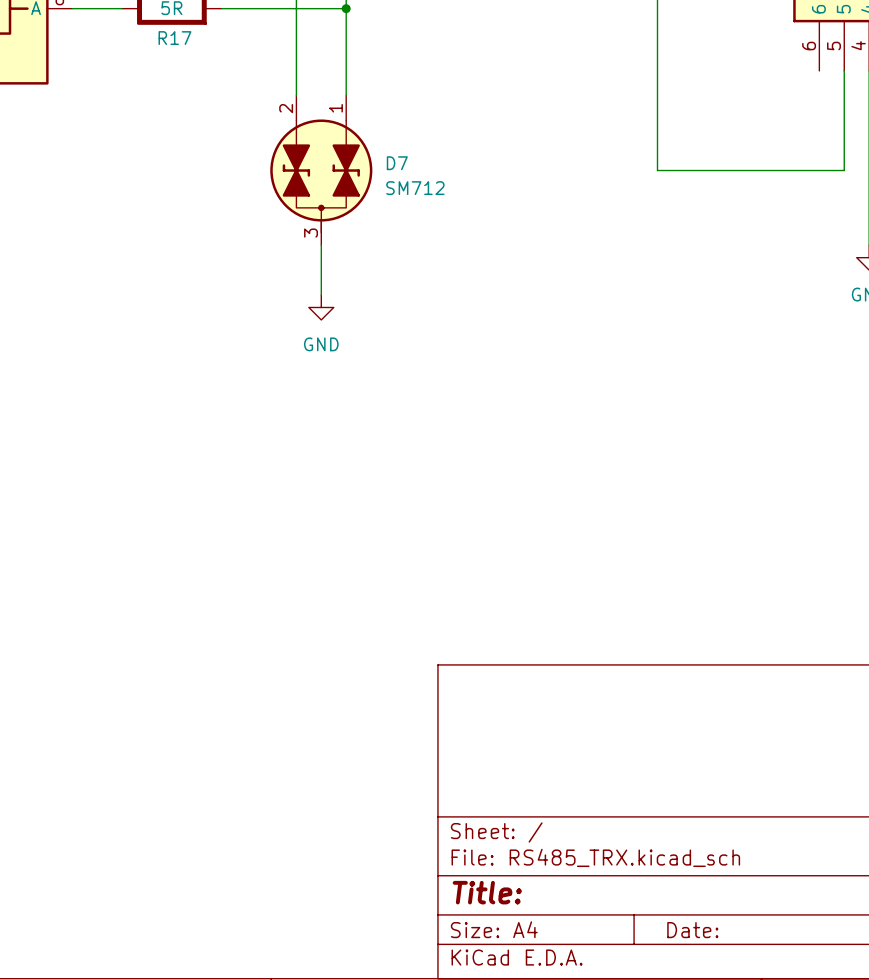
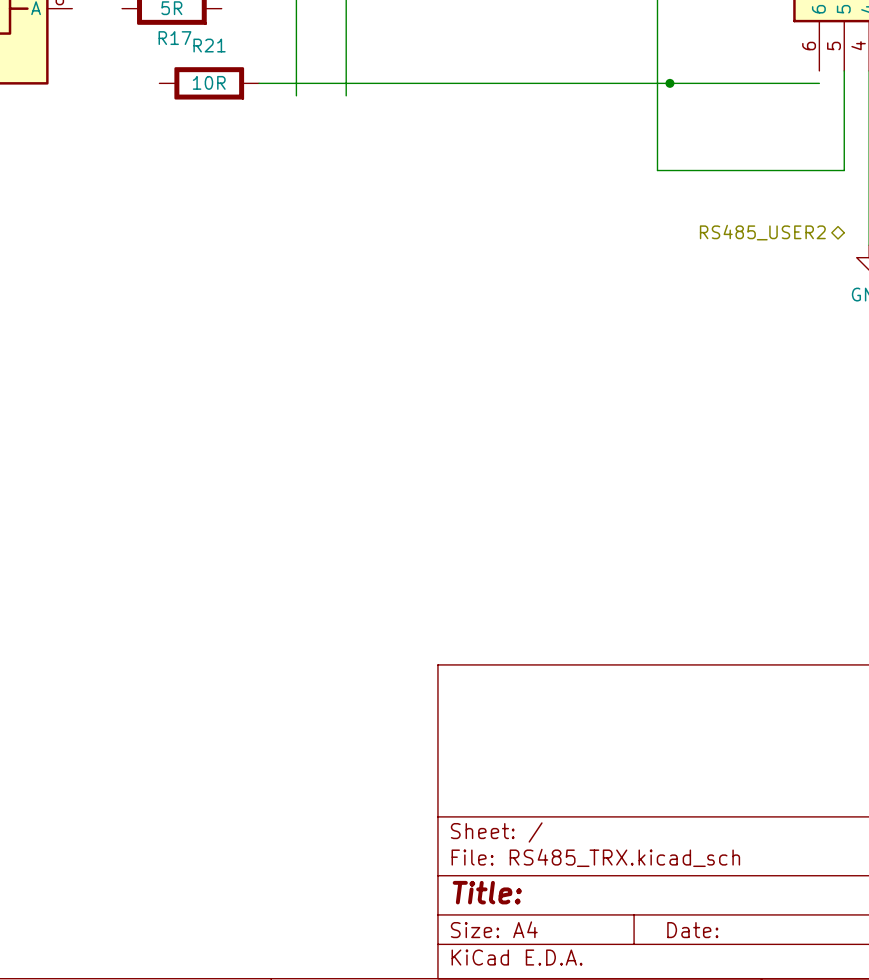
wire: (72, 8) (122, 8) -> none
wire: (221, 8) (346, 8) -> none
junction: (346, 8) -> none
R21: none -> 10R (209, 83)
wire: none -> (259, 83) (819, 83)
junction: none -> (669, 83)
D7: SM712 (321, 170) -> none
hierarchical label: none -> RS485_USER2 (762, 232)
wire: (321, 245) (321, 295) -> none
power symbol: GND (321, 307) -> none

